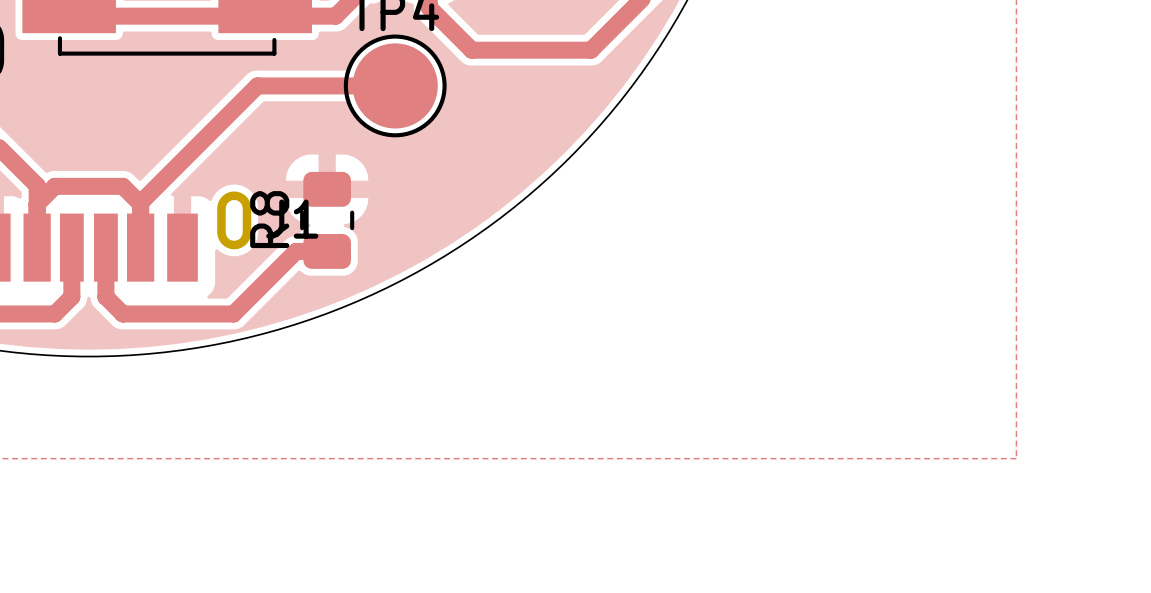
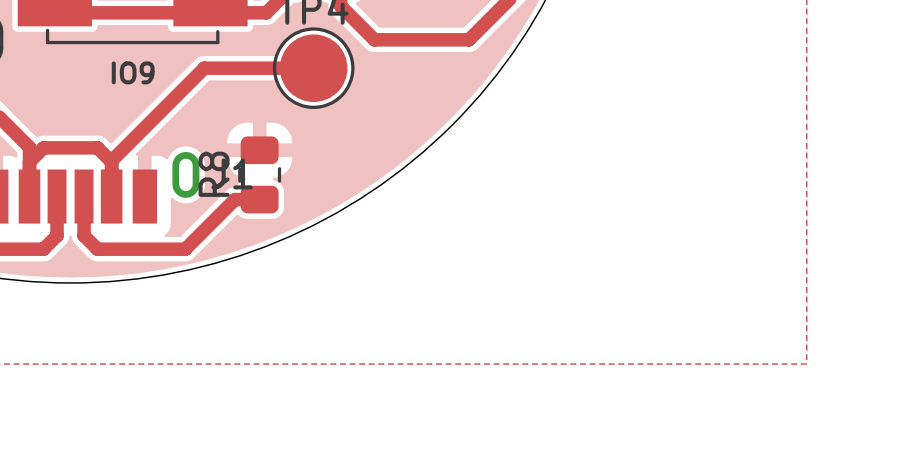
part value: none -> IO9 (133, 72)

